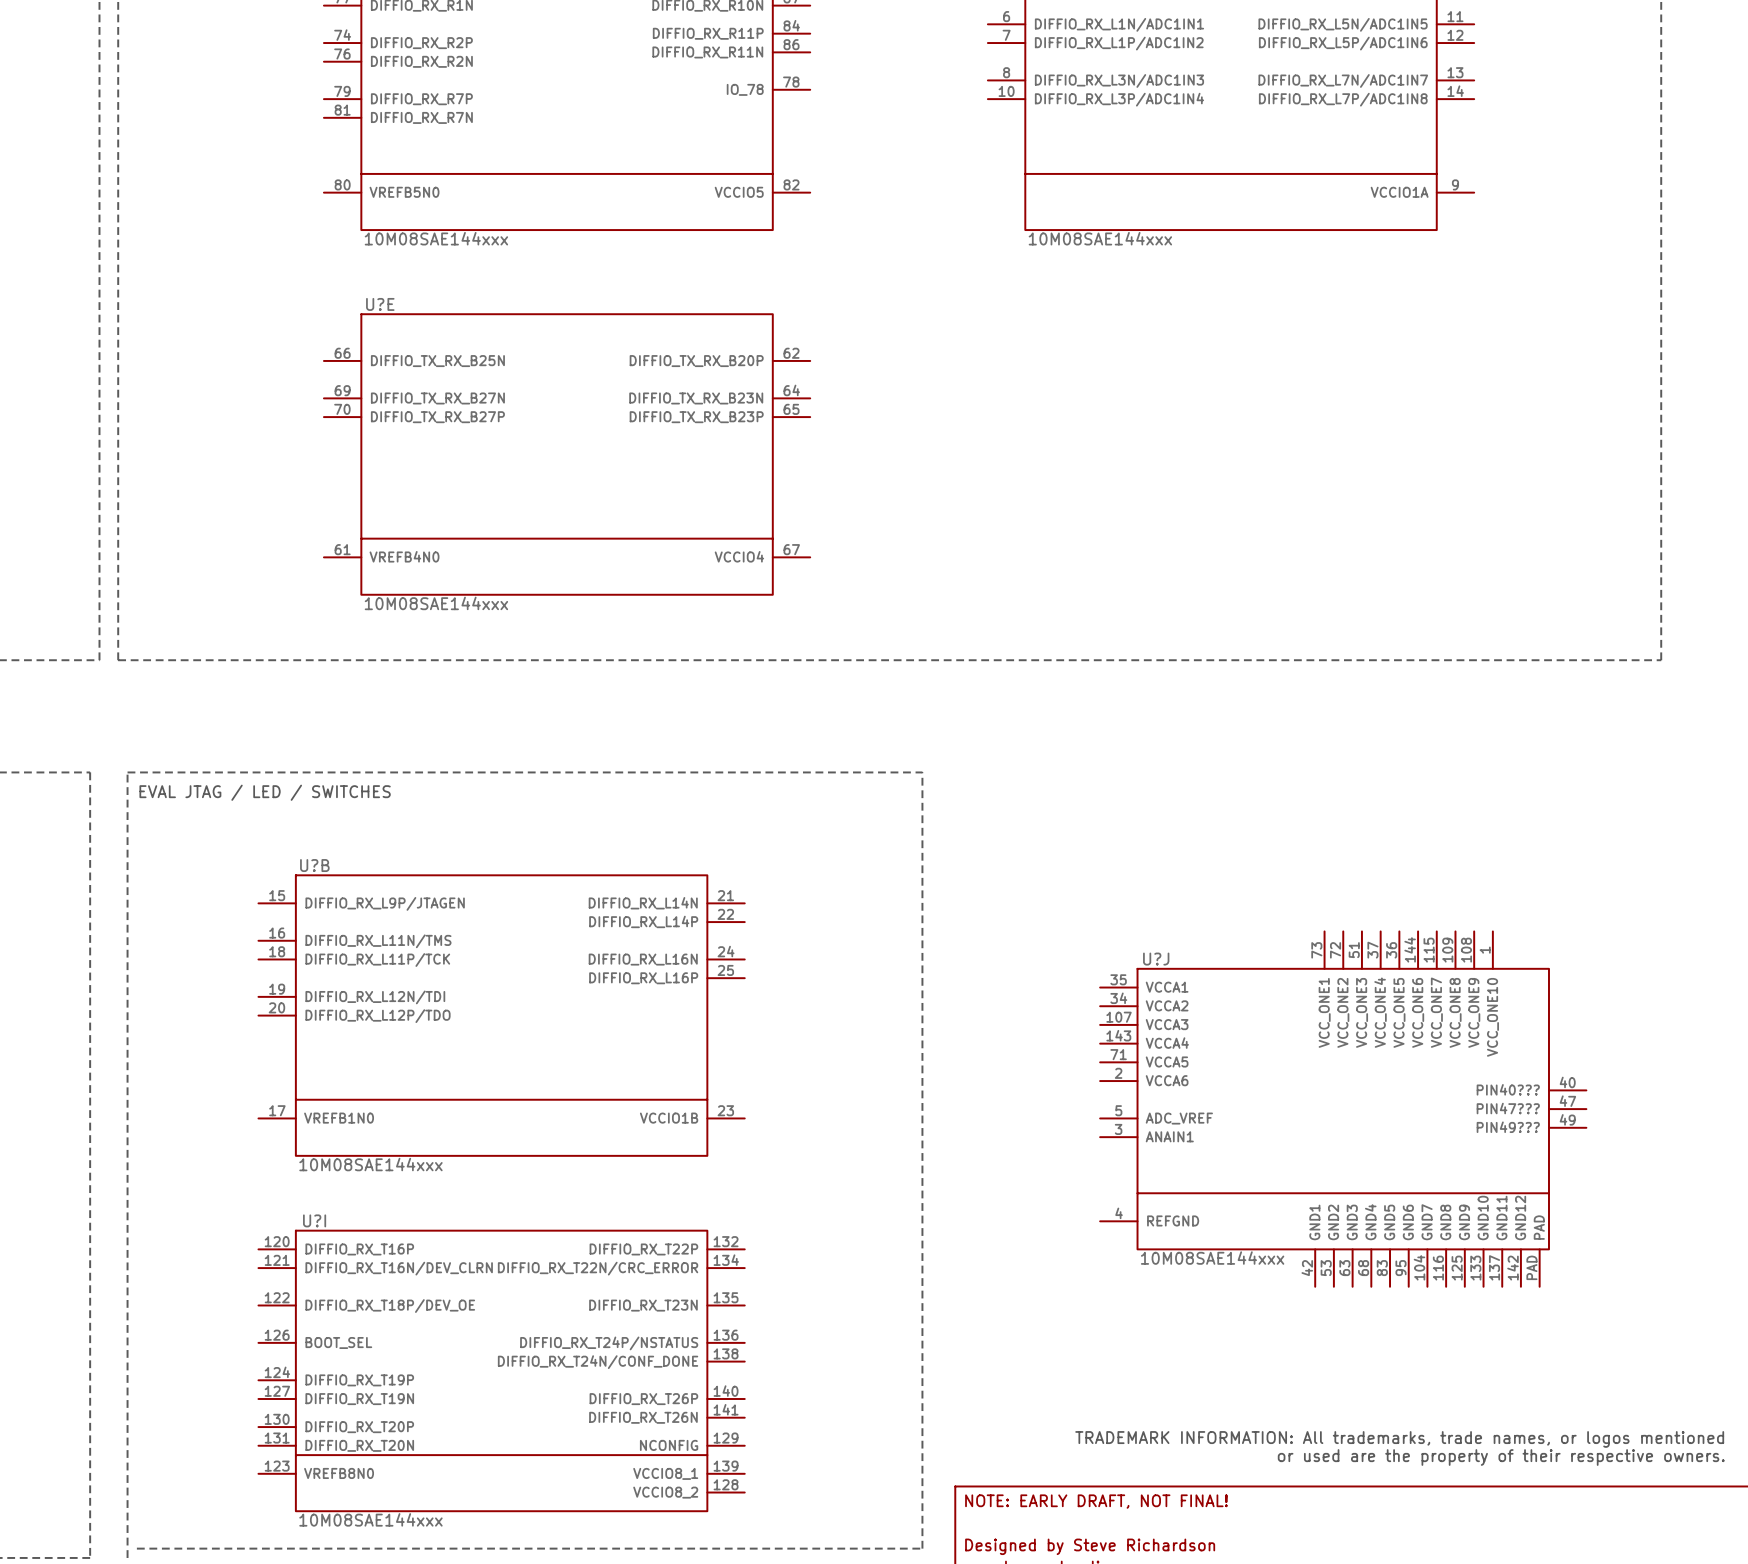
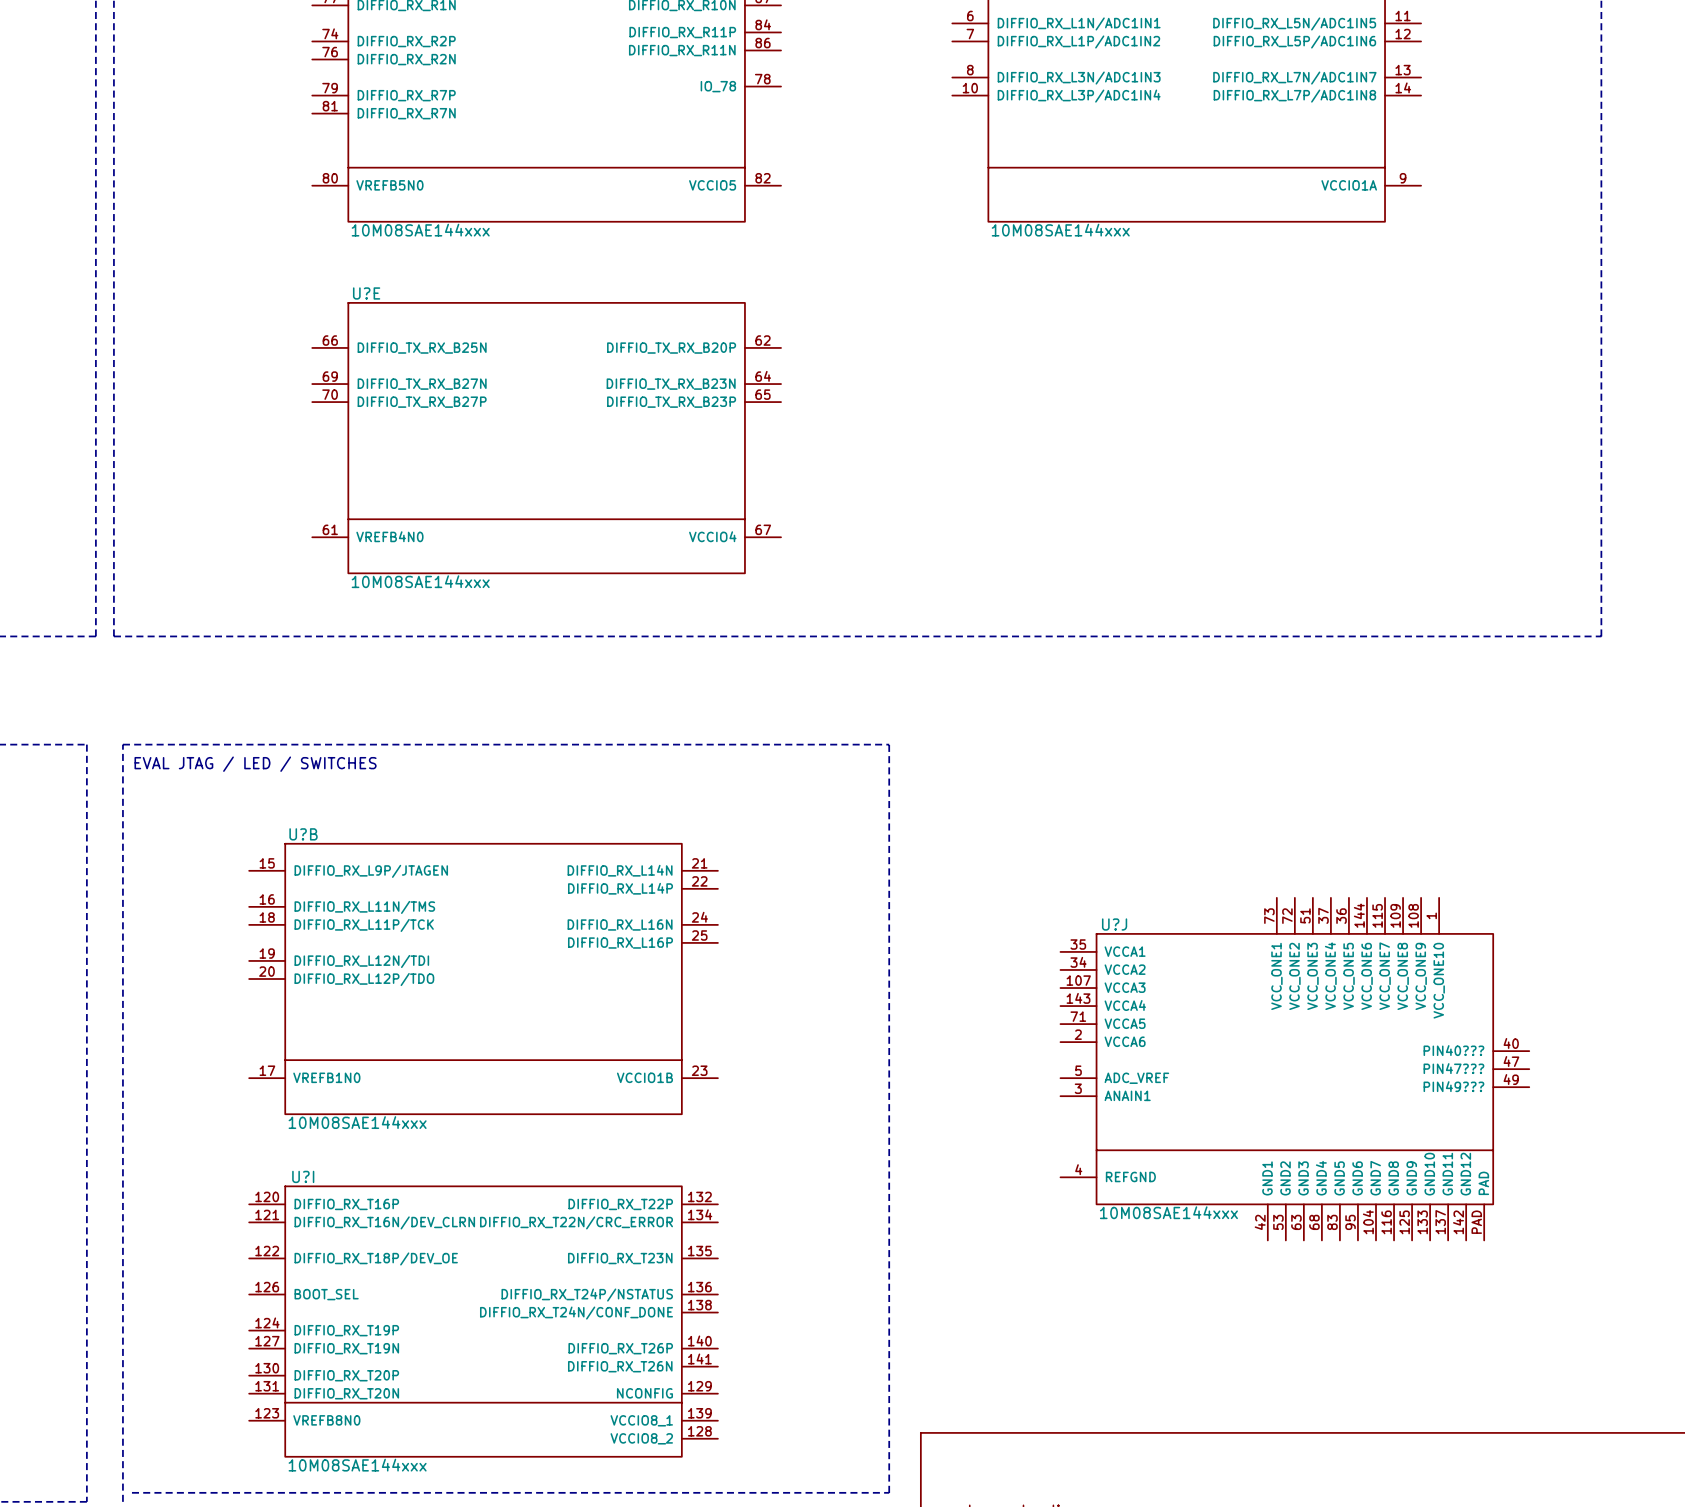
text: TRADEMARK INFORMATION: All trademarks, trade names, or logos mentioned (1399, 1439) -> none
text: or used are the property of their respective owners. (1501, 1457) -> none
title block: NOTE: EARLY DRAFT, NOT FINAL! (1096, 1501) -> none
title block: Designed by Steve Richardson (1090, 1546) -> none

